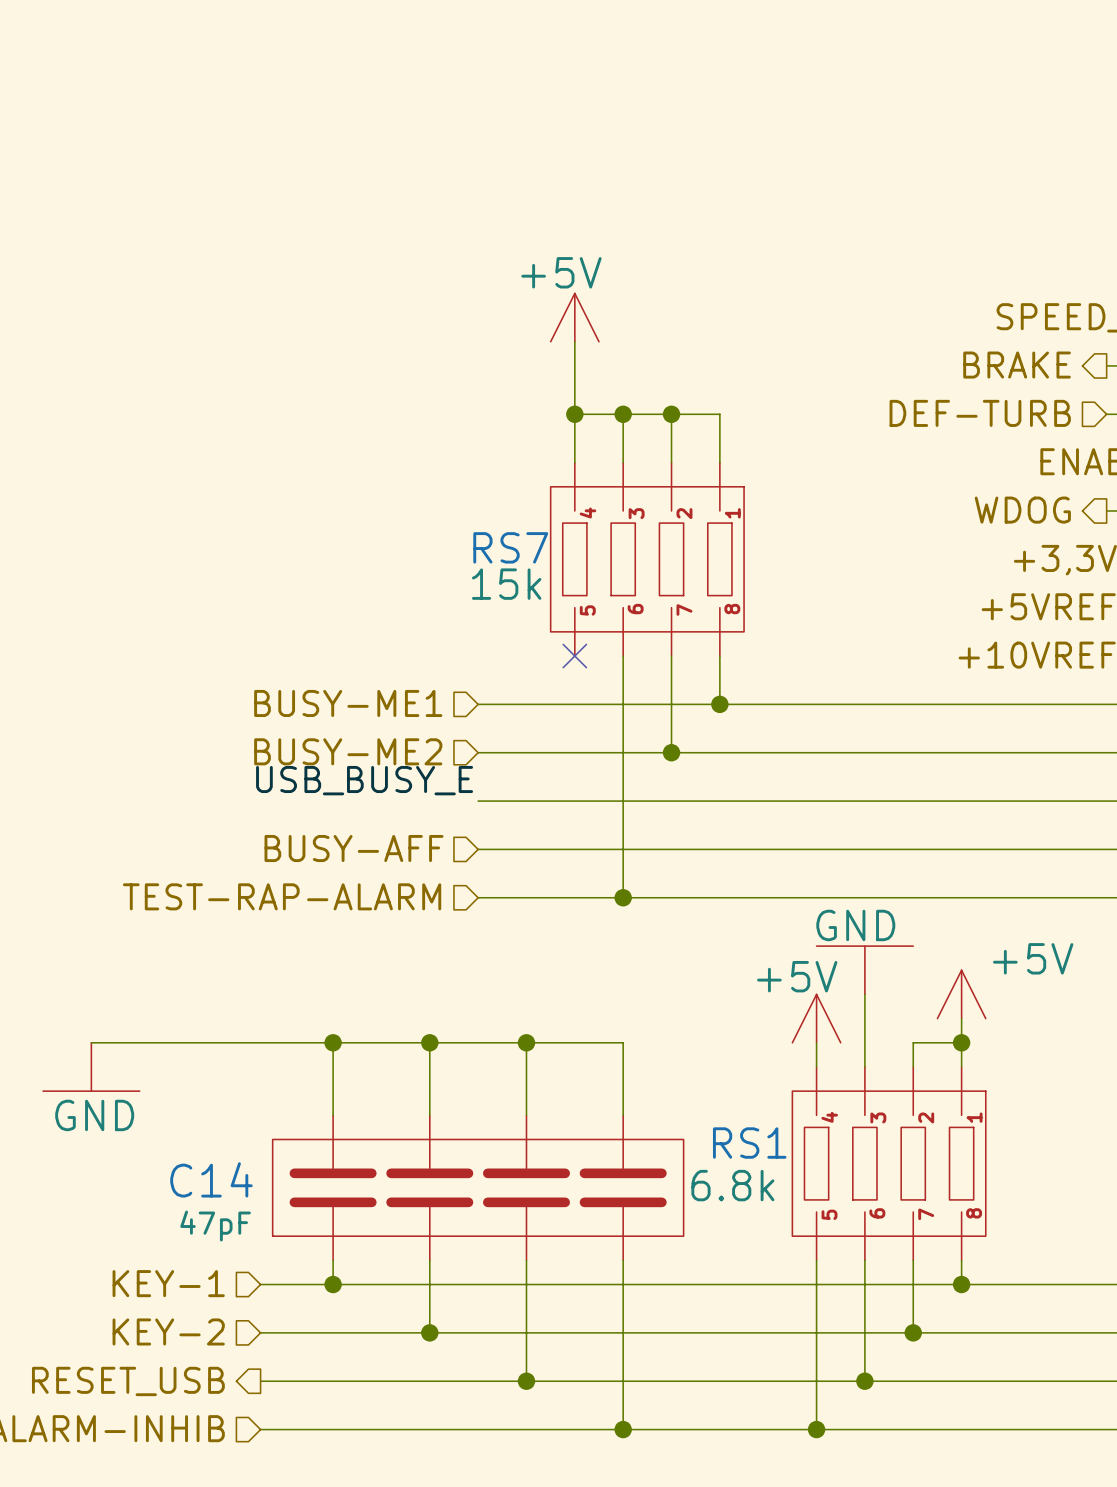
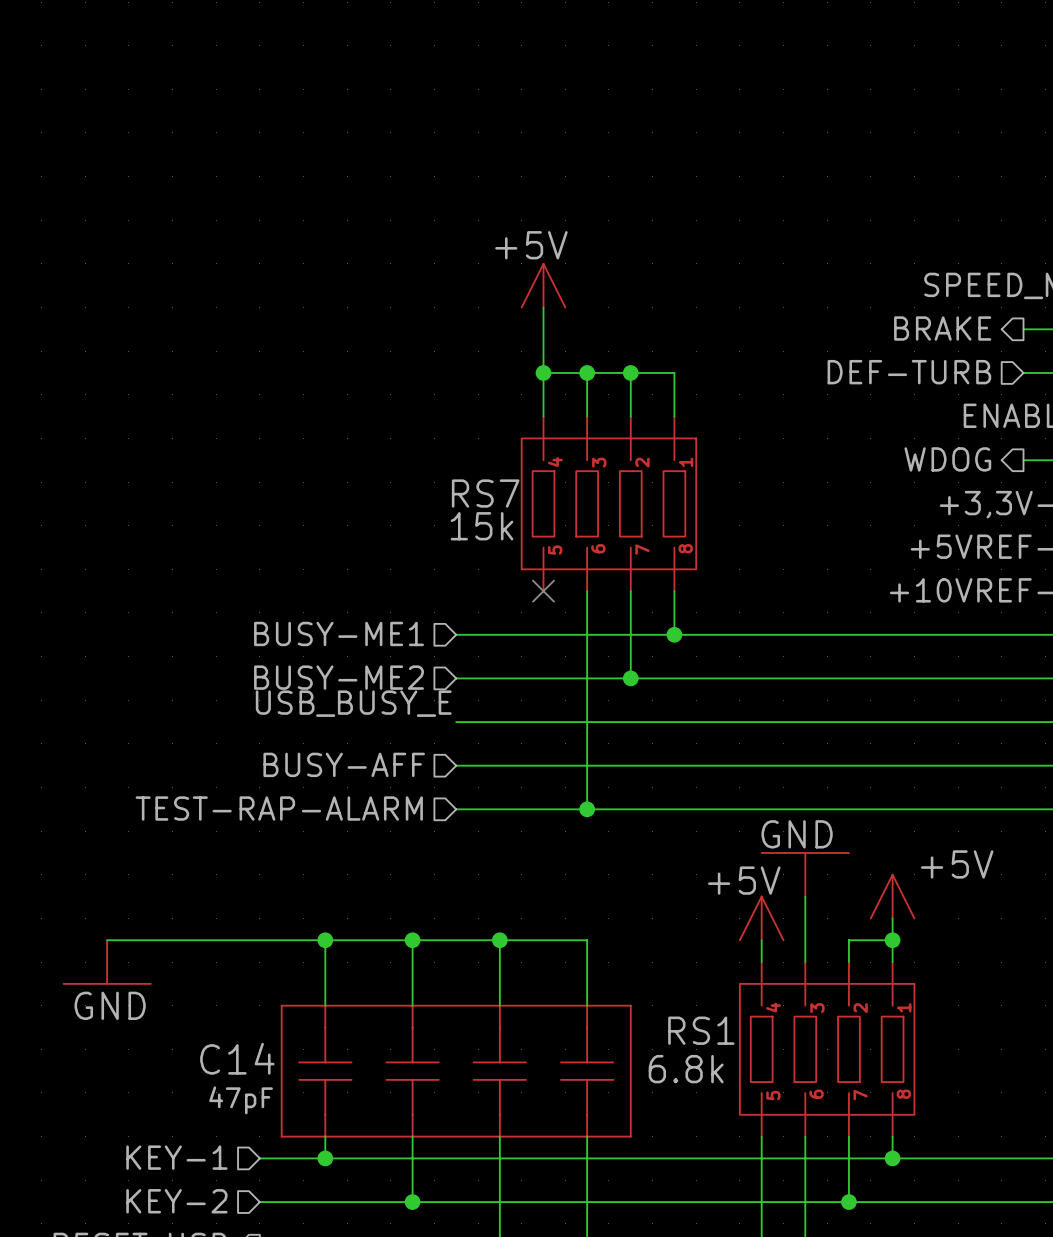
C14 symbol: [272, 1115, 684, 1261] -> [281, 1005, 631, 1137]

